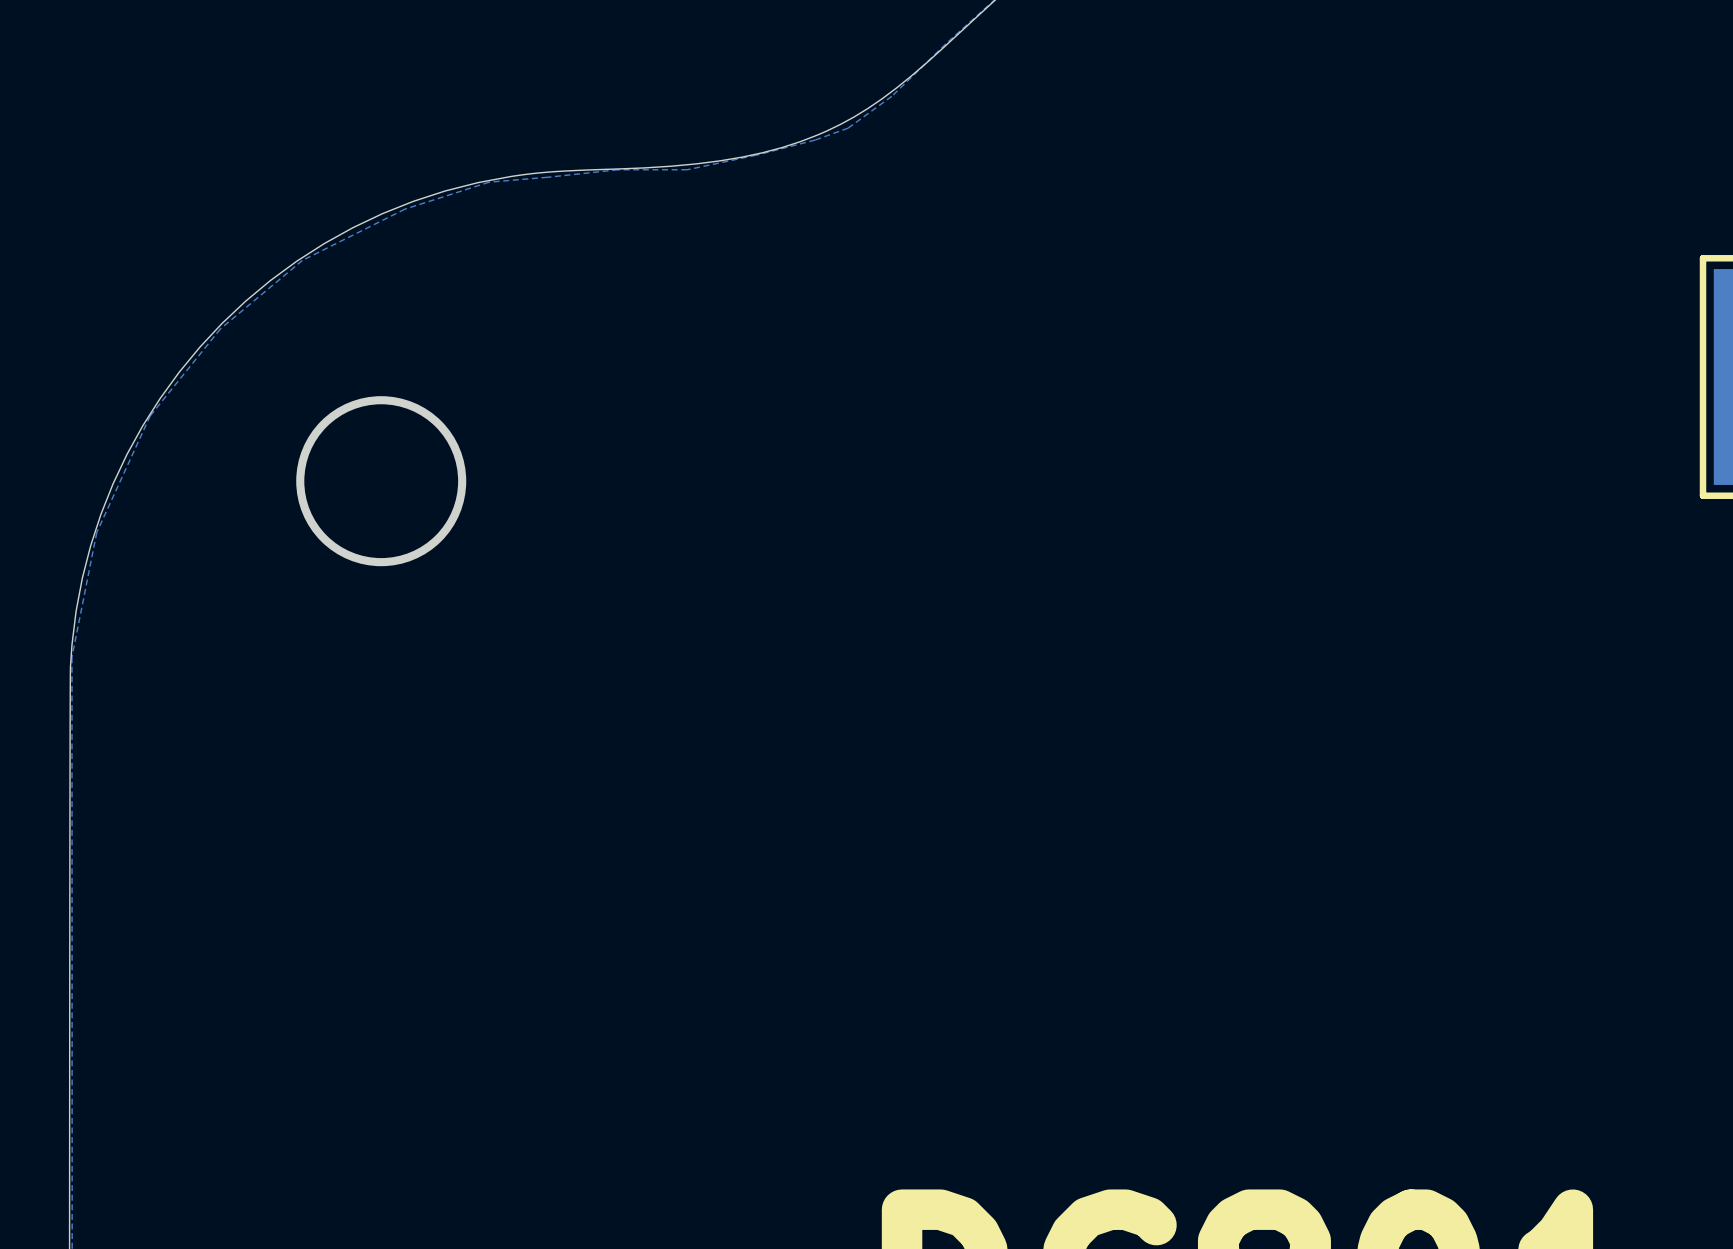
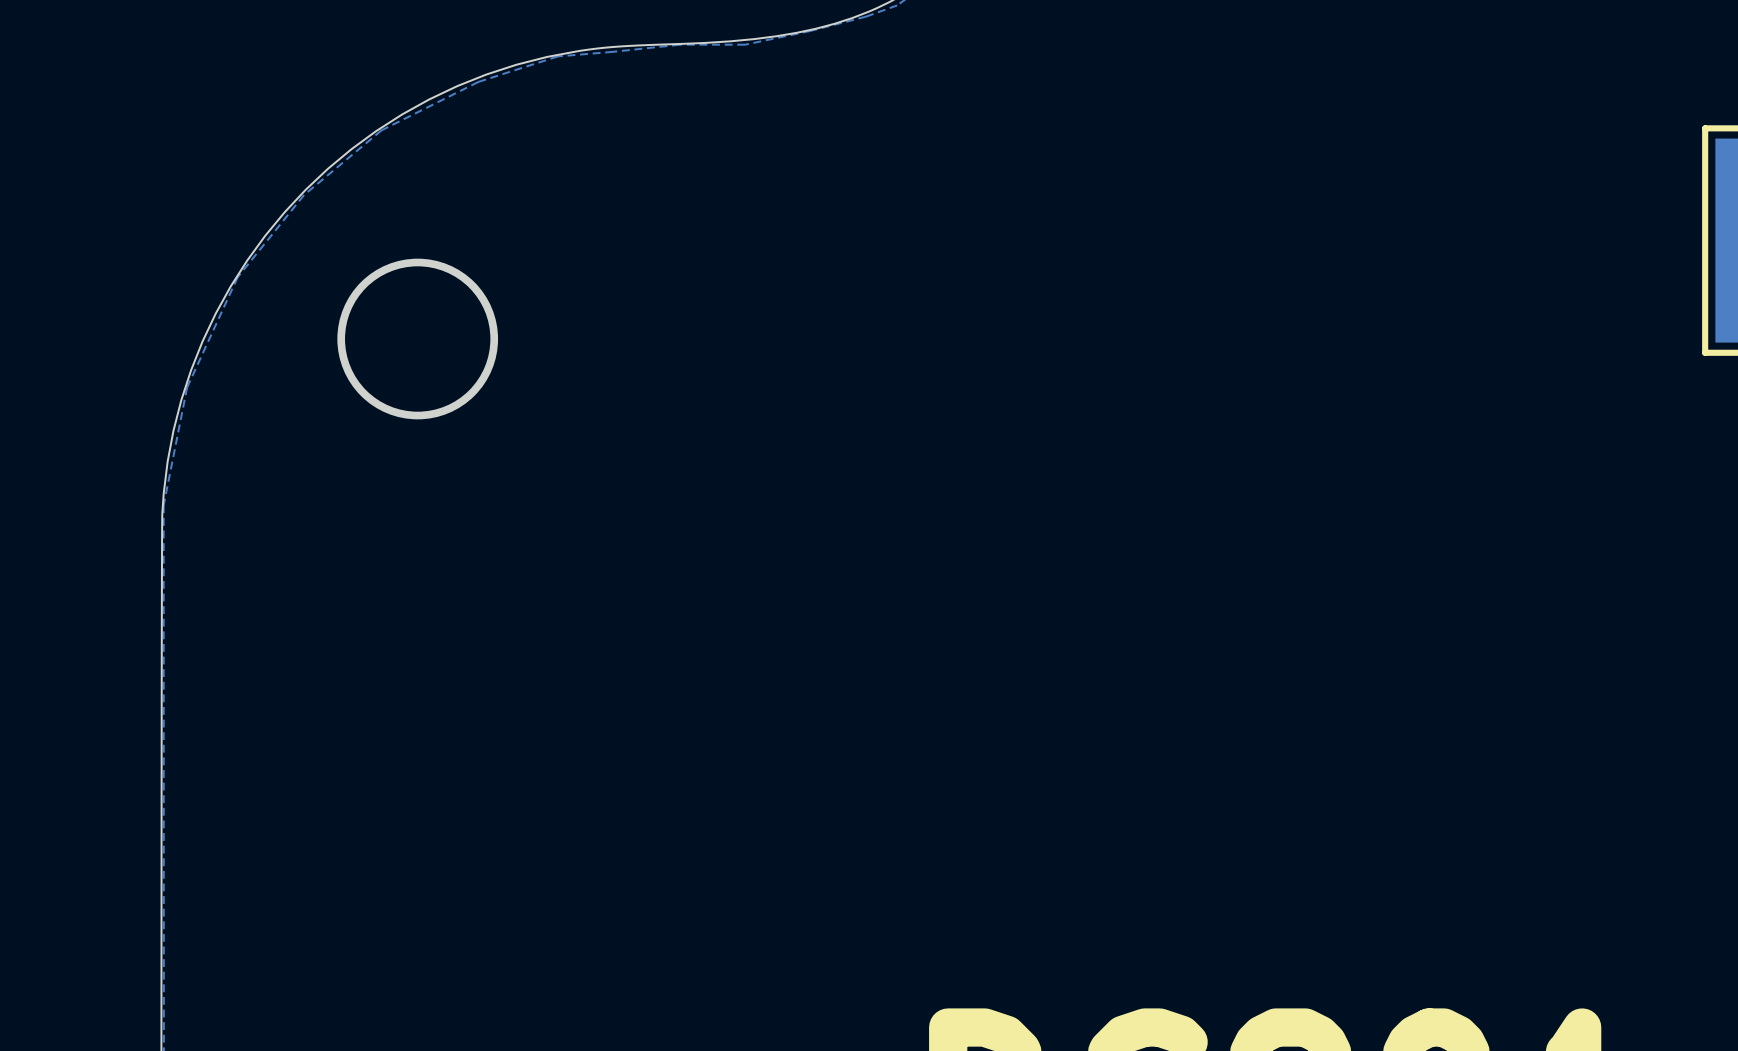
round board edge position: (381, 481) -> (417, 339)

